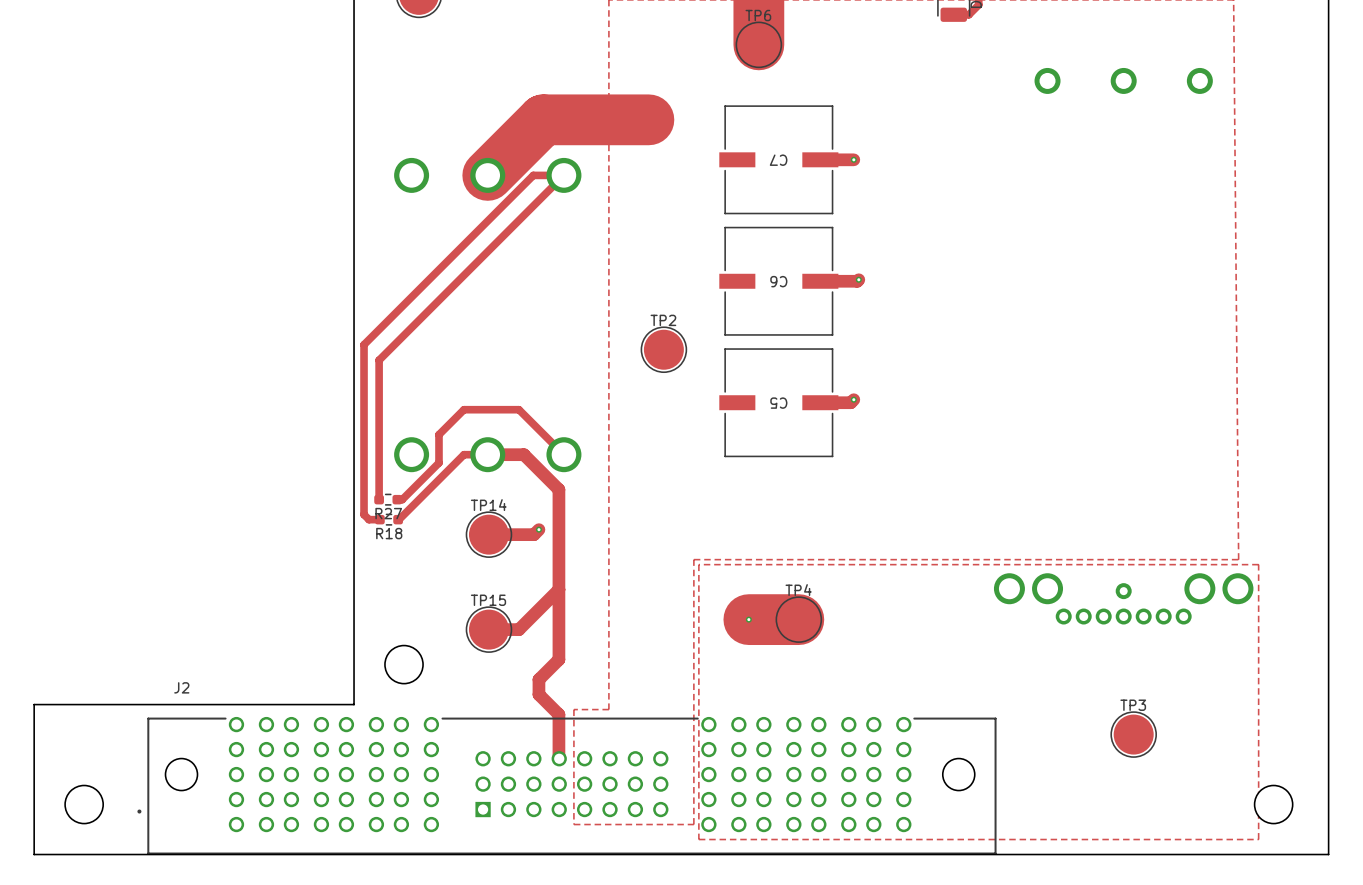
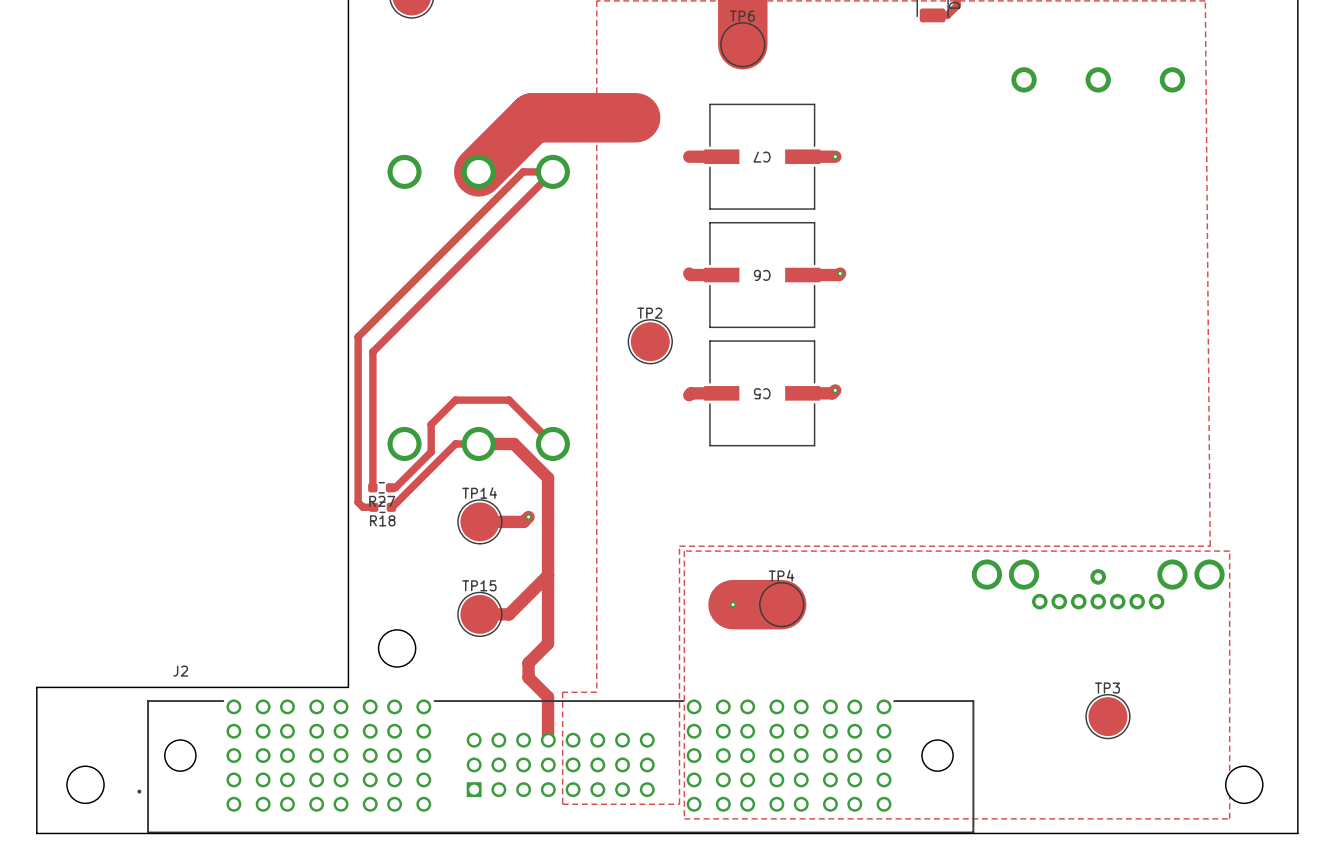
track: none -> (689, 156) (721, 156)
track: none -> (689, 273) (721, 275)
track: none -> (721, 393) (691, 393) (689, 395)

